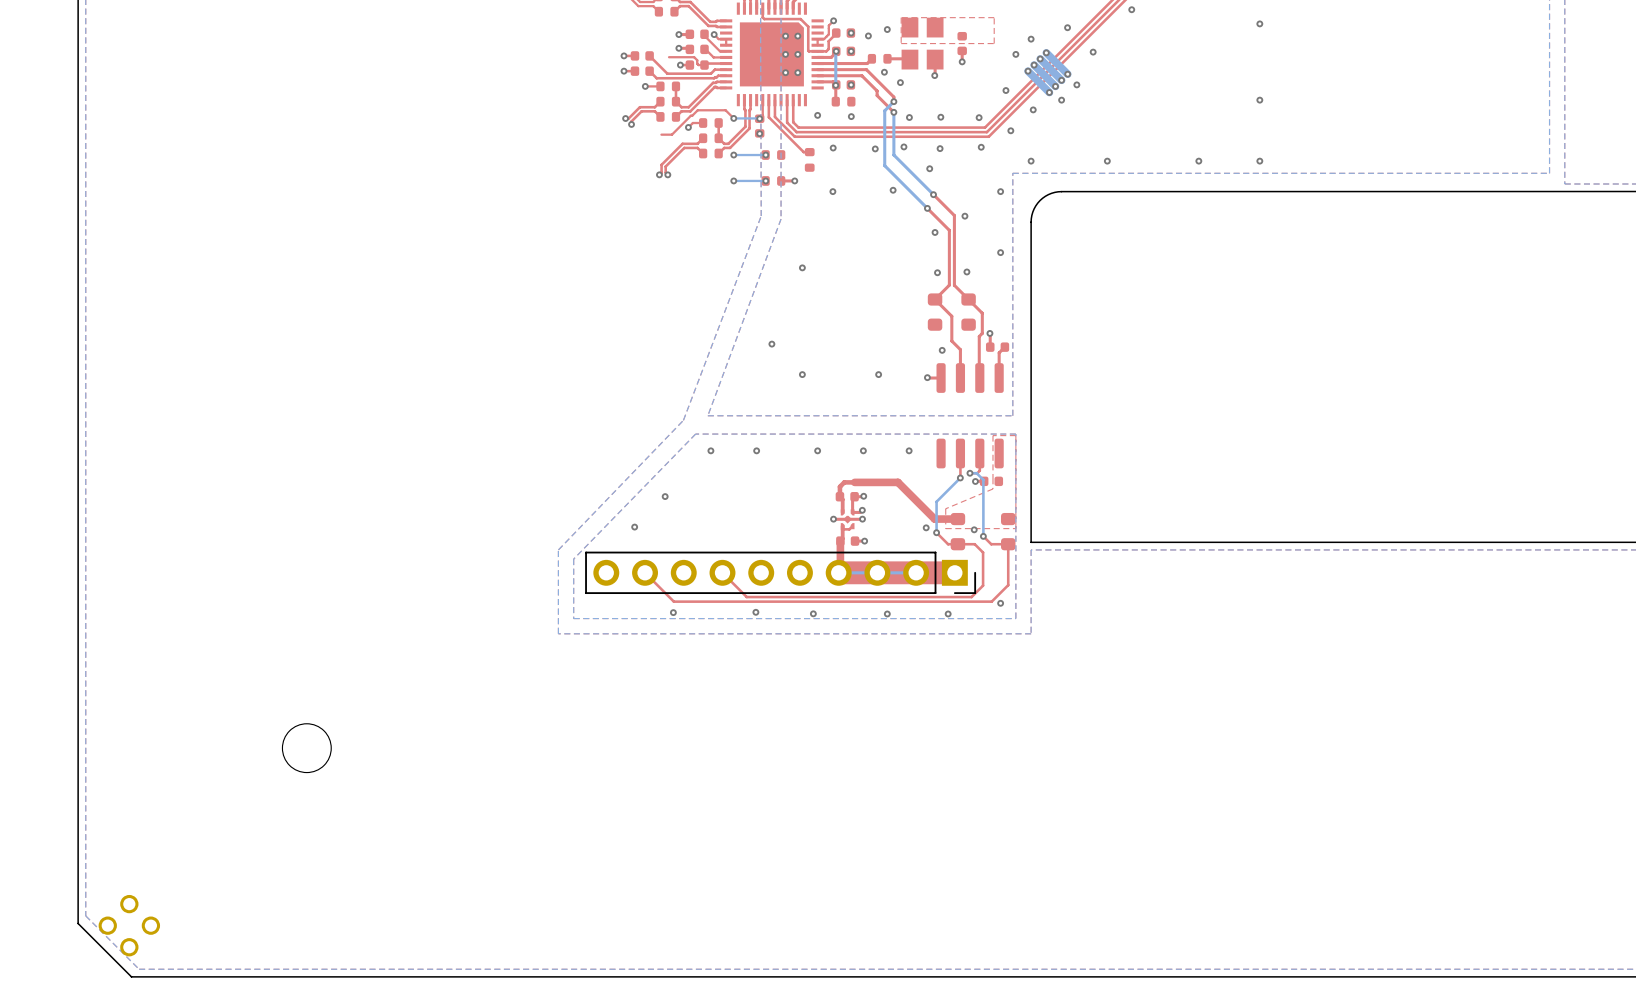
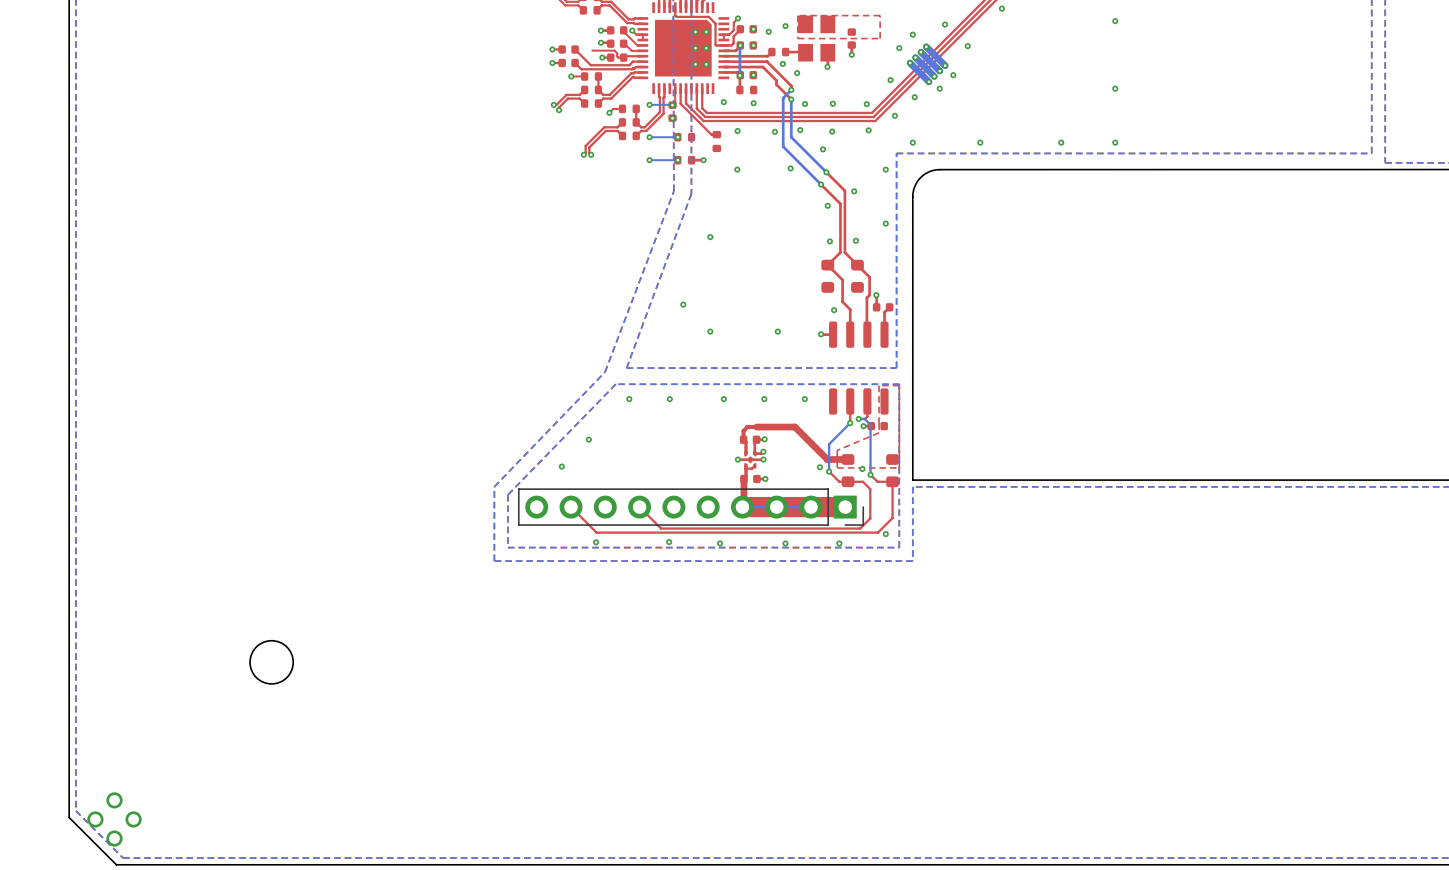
top track: (733, 118) (725, 110) (697, 110) (671, 134) (661, 134) -> none

